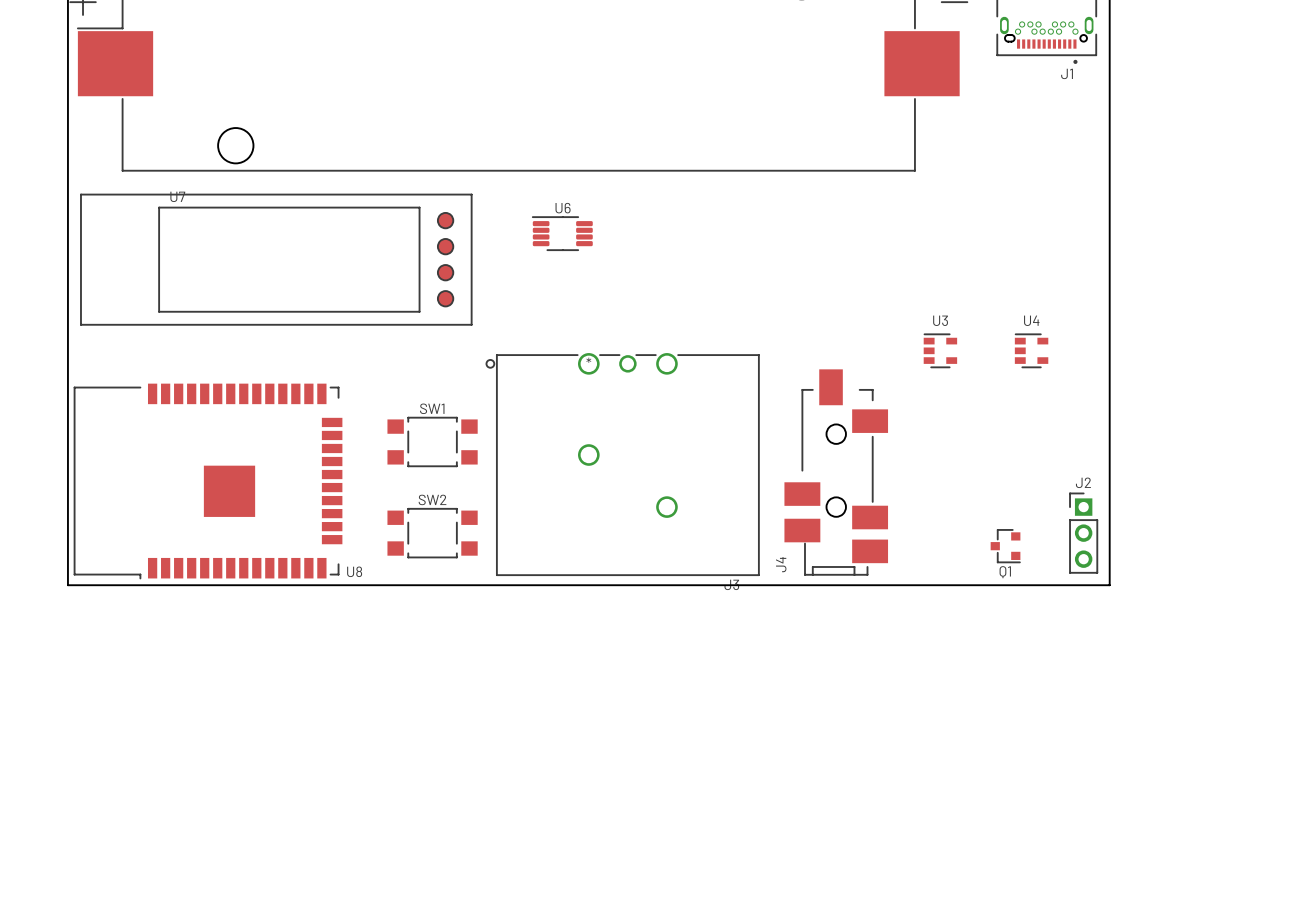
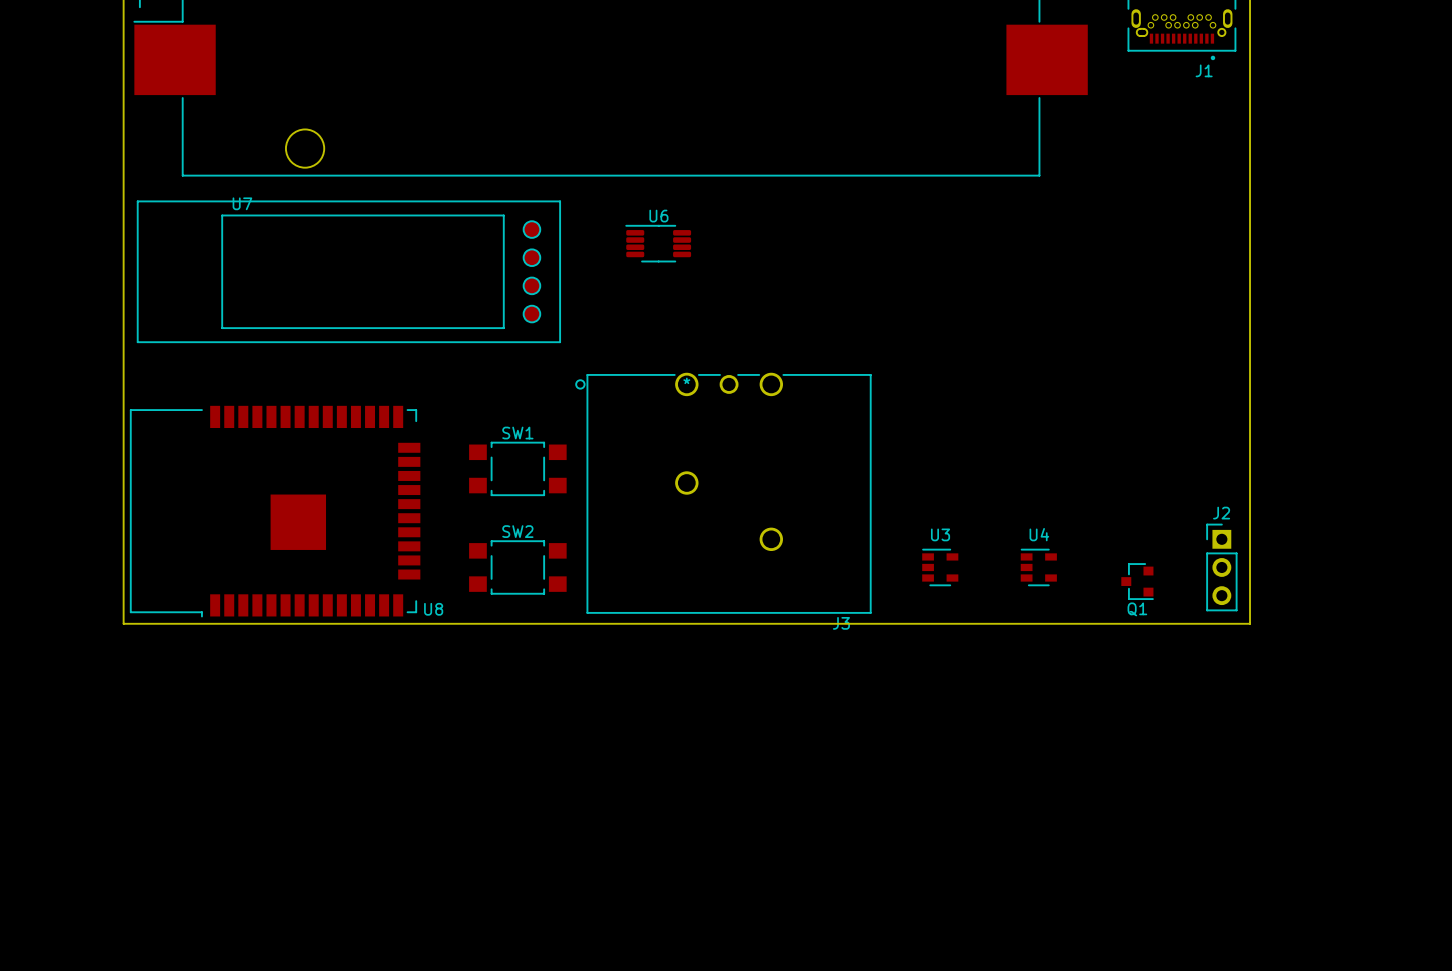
U3 position: (940, 350) -> (940, 567)
U4 position: (1031, 350) -> (1038, 567)
J4: (836, 472) -> none

